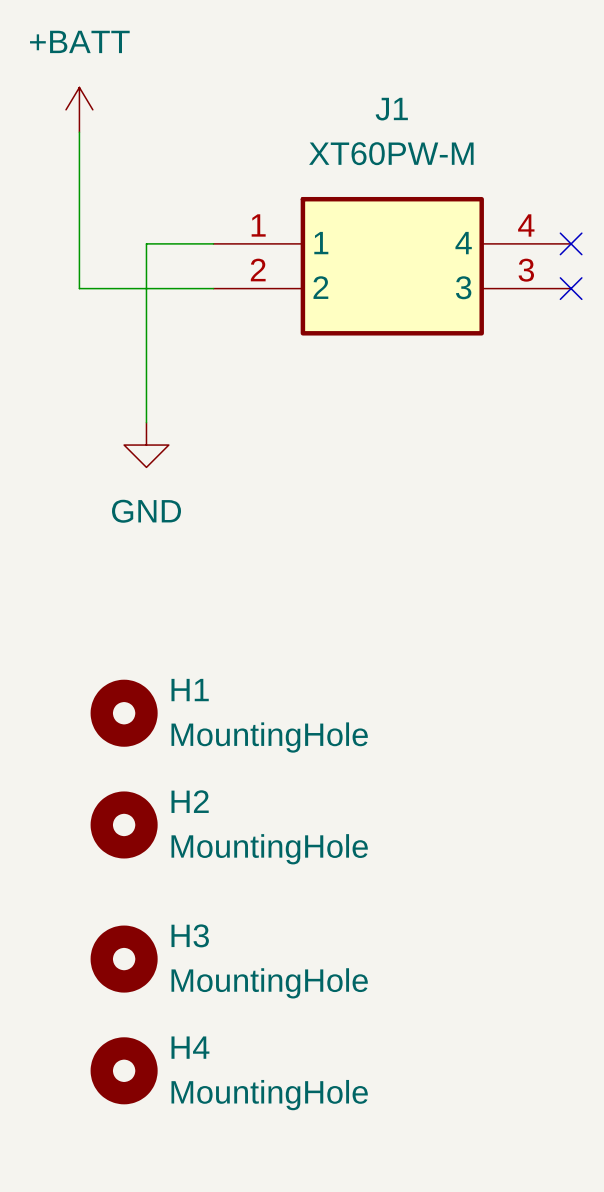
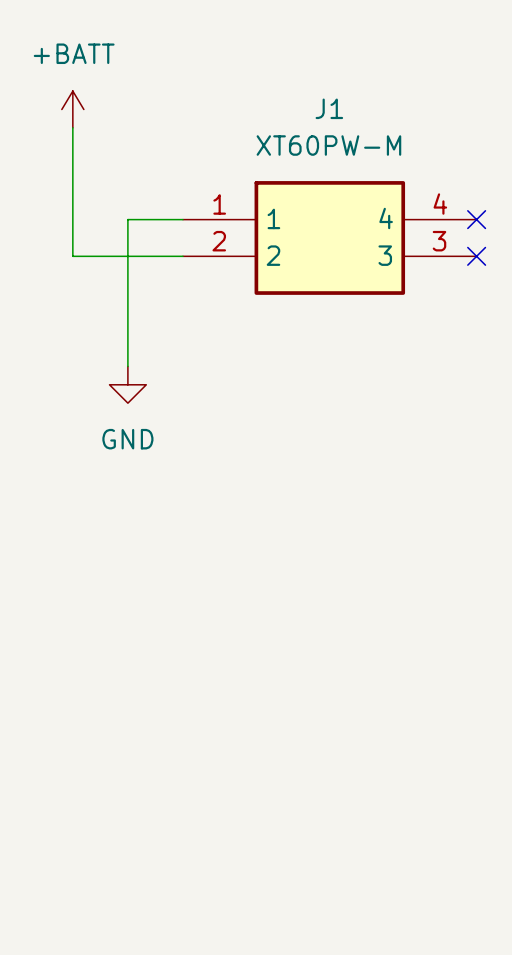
H1: MountingHole (124, 713) -> none
H2: MountingHole (124, 824) -> none
H3: MountingHole (124, 959) -> none
H4: MountingHole (124, 1070) -> none

